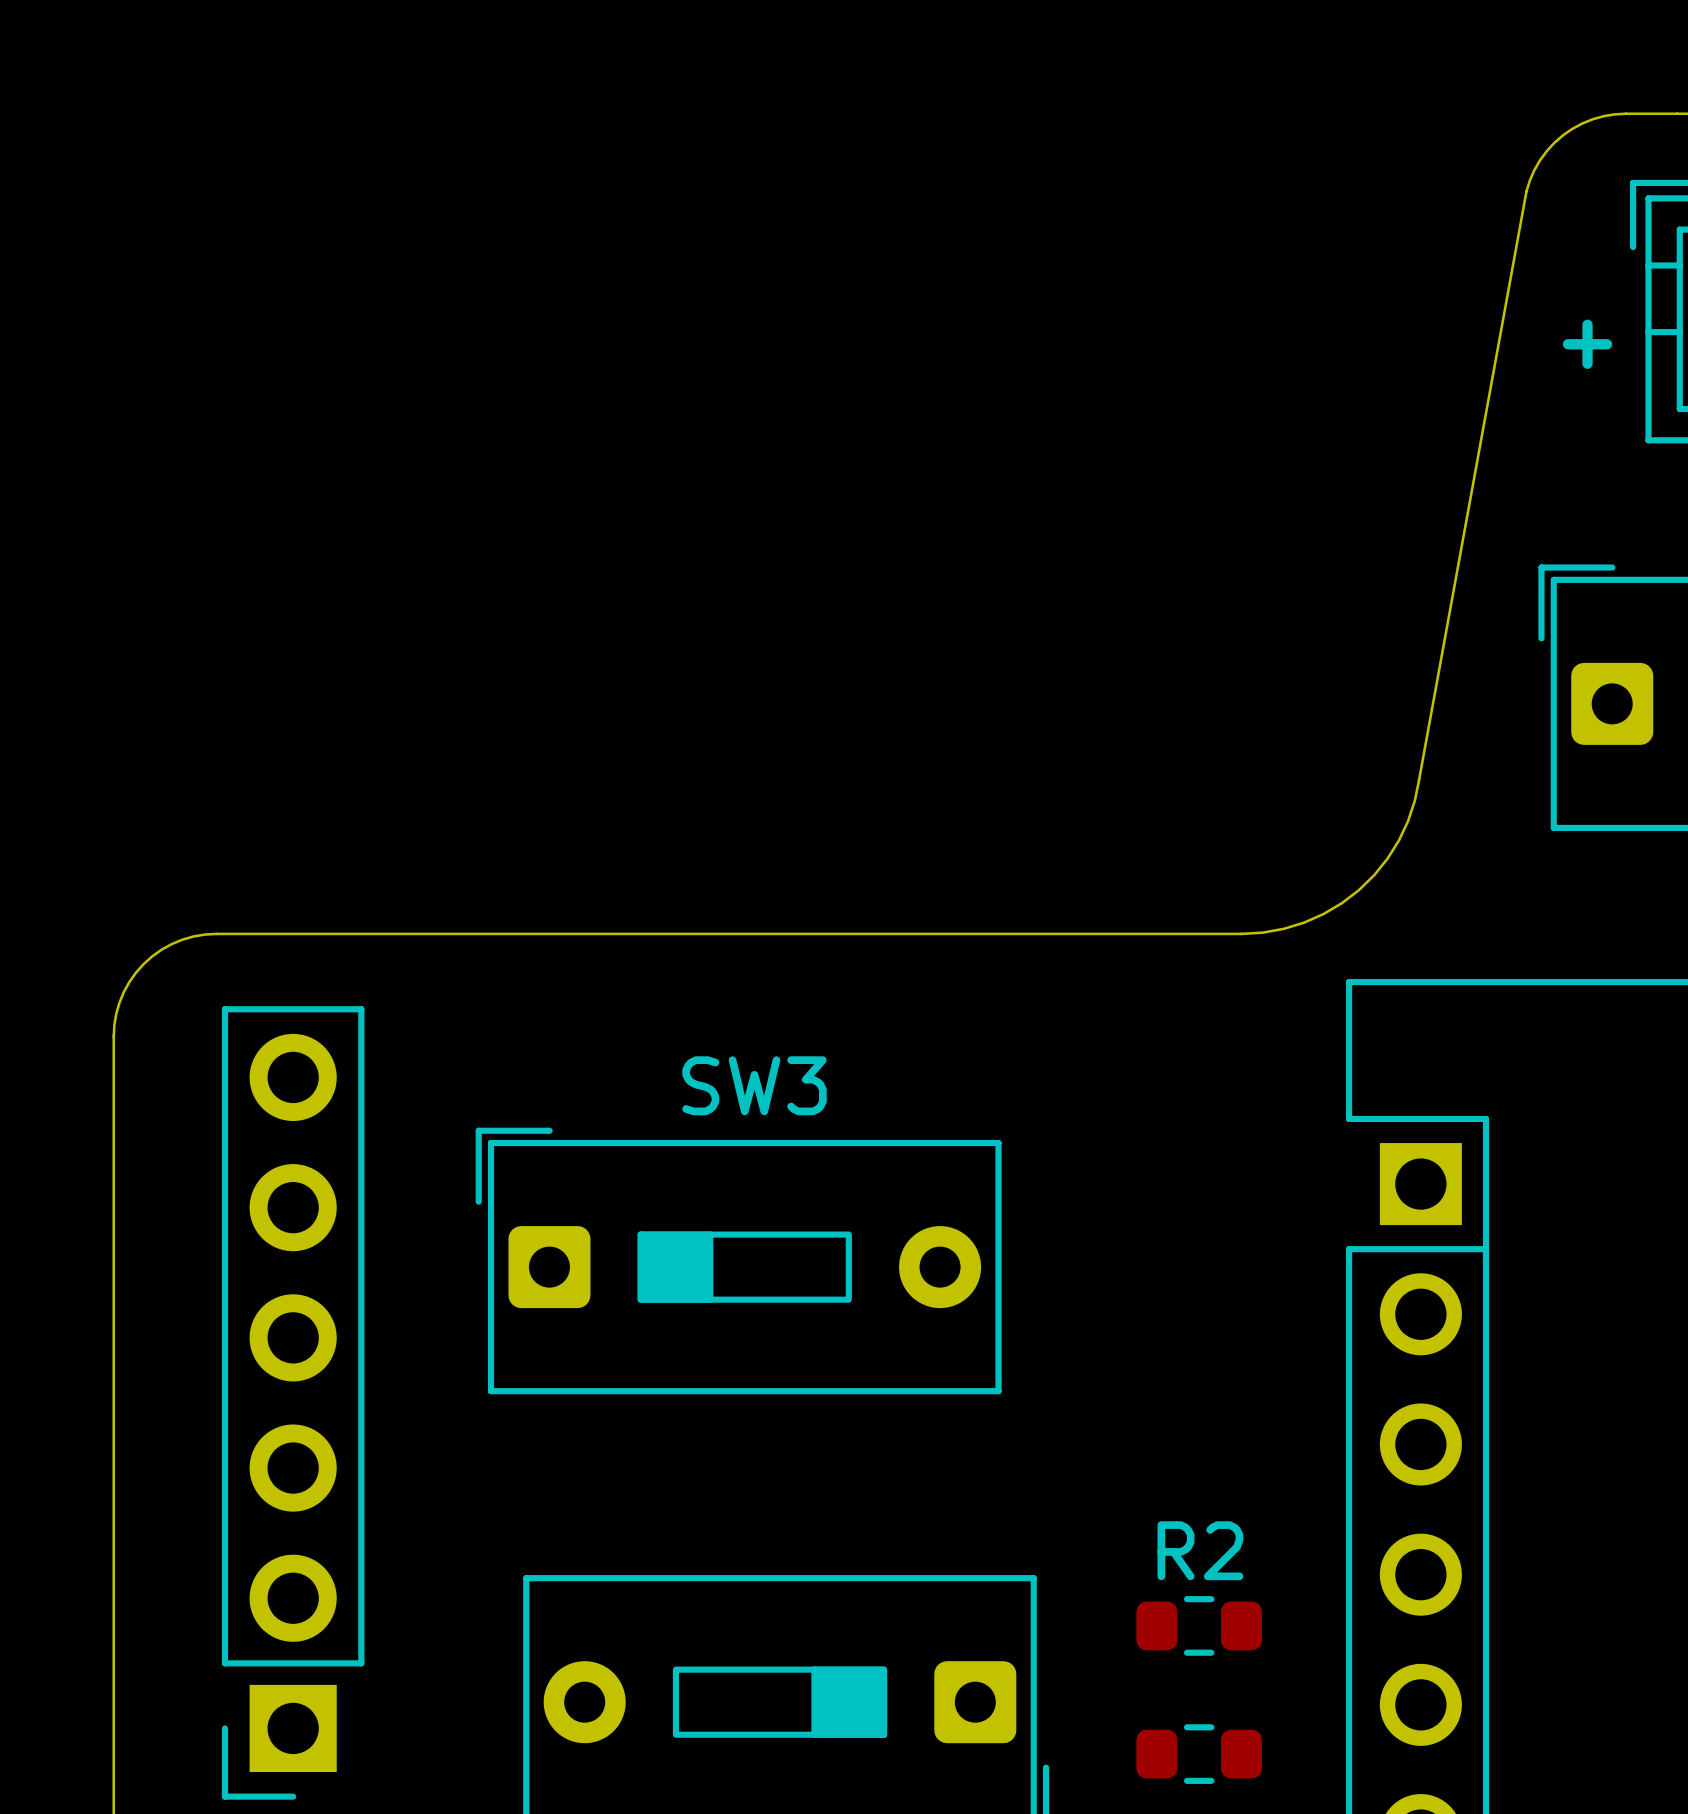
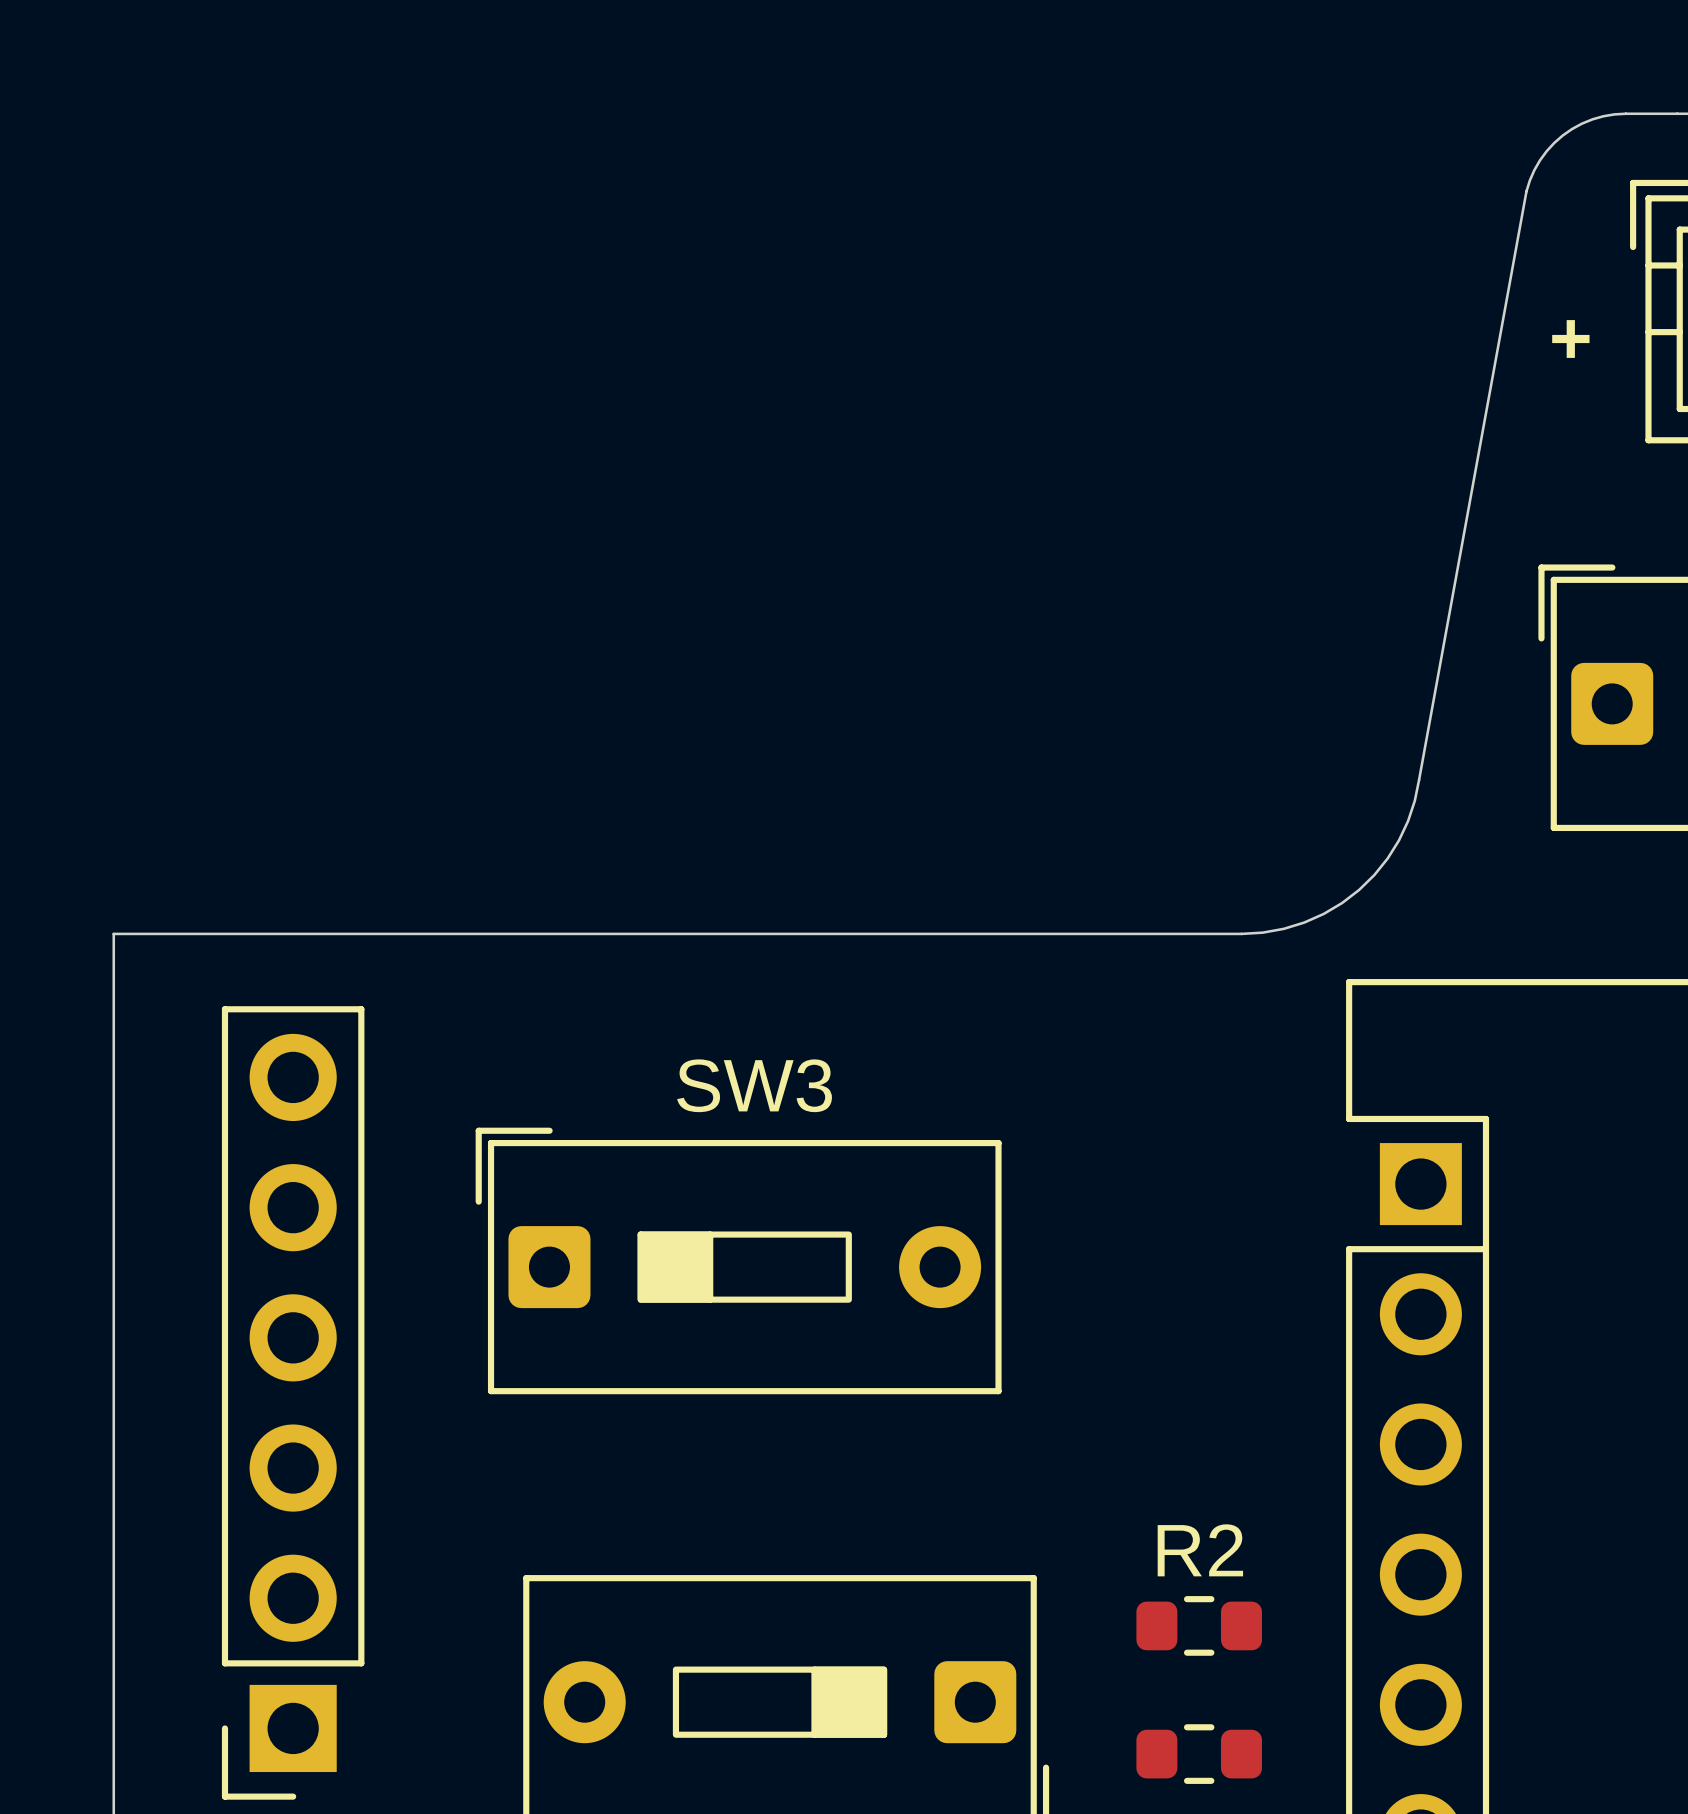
board edge: (216, 933) (182, 939) (161, 949) (143, 963) (123, 991) (116, 1013) (113, 1036) -> (216, 933) (113, 933) (113, 1036)

